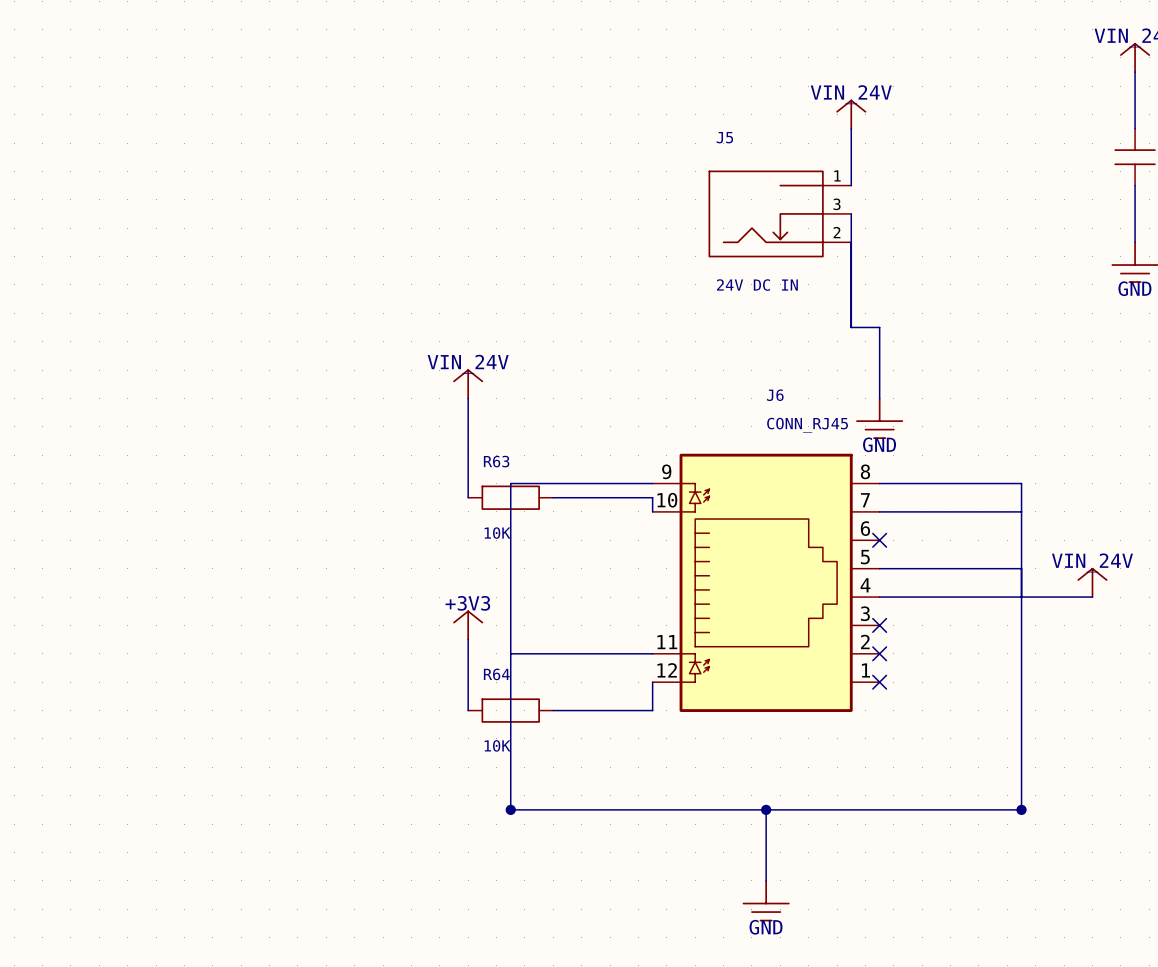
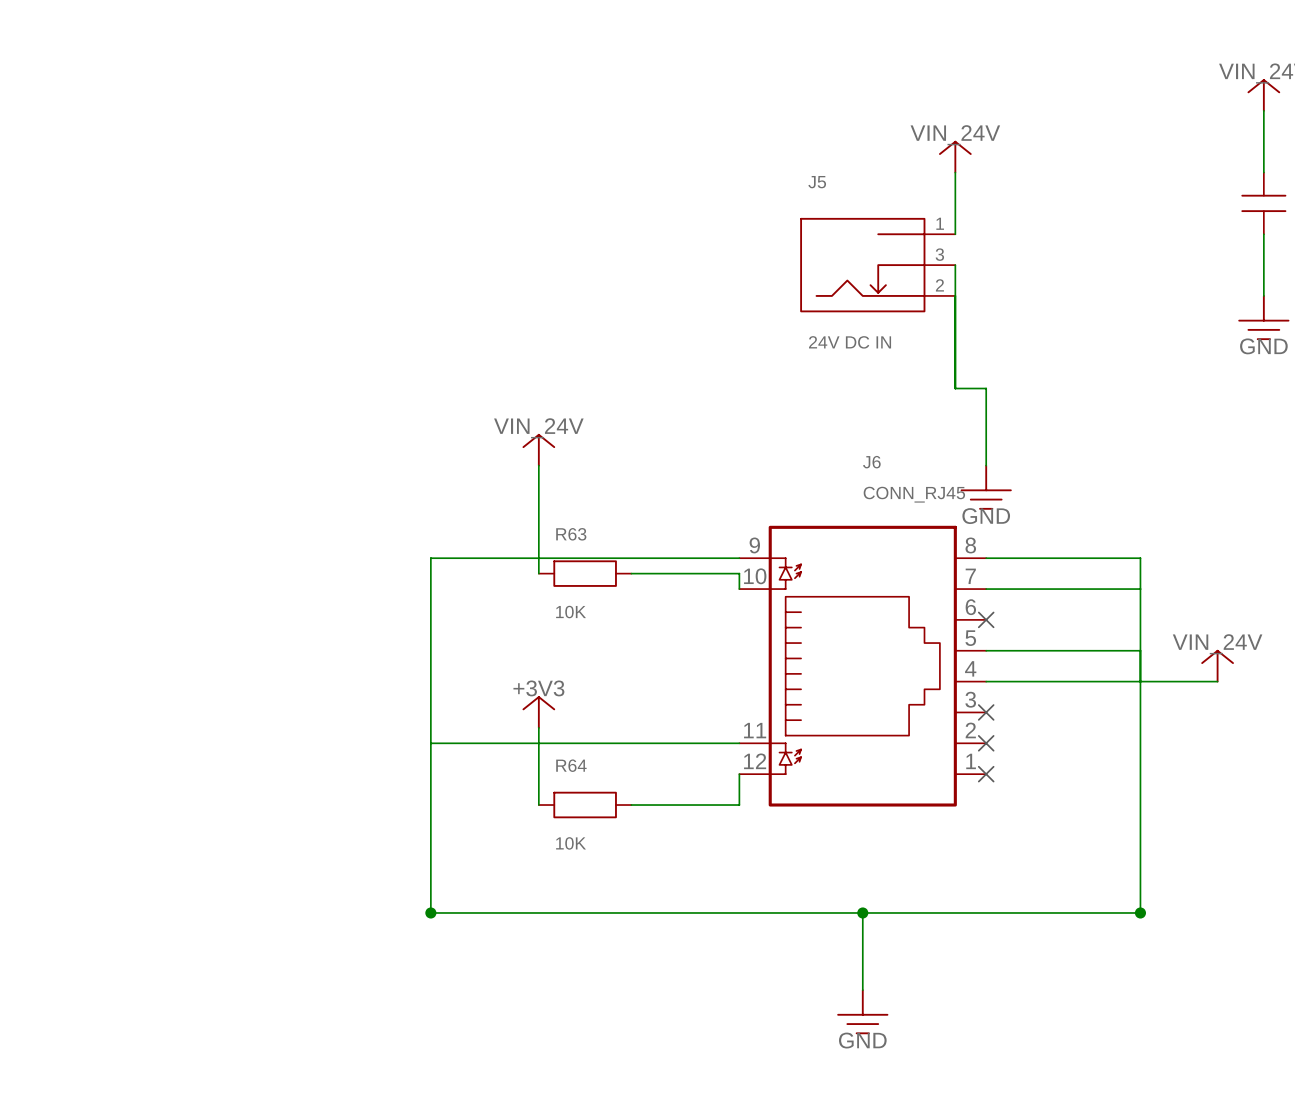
wire: (510, 483) (510, 809) -> (585, 558) (430, 558) (430, 912) (585, 912)
wire: none -> (430, 743) (585, 743)
junction: none -> (430, 912)
junction: (510, 809) -> none

